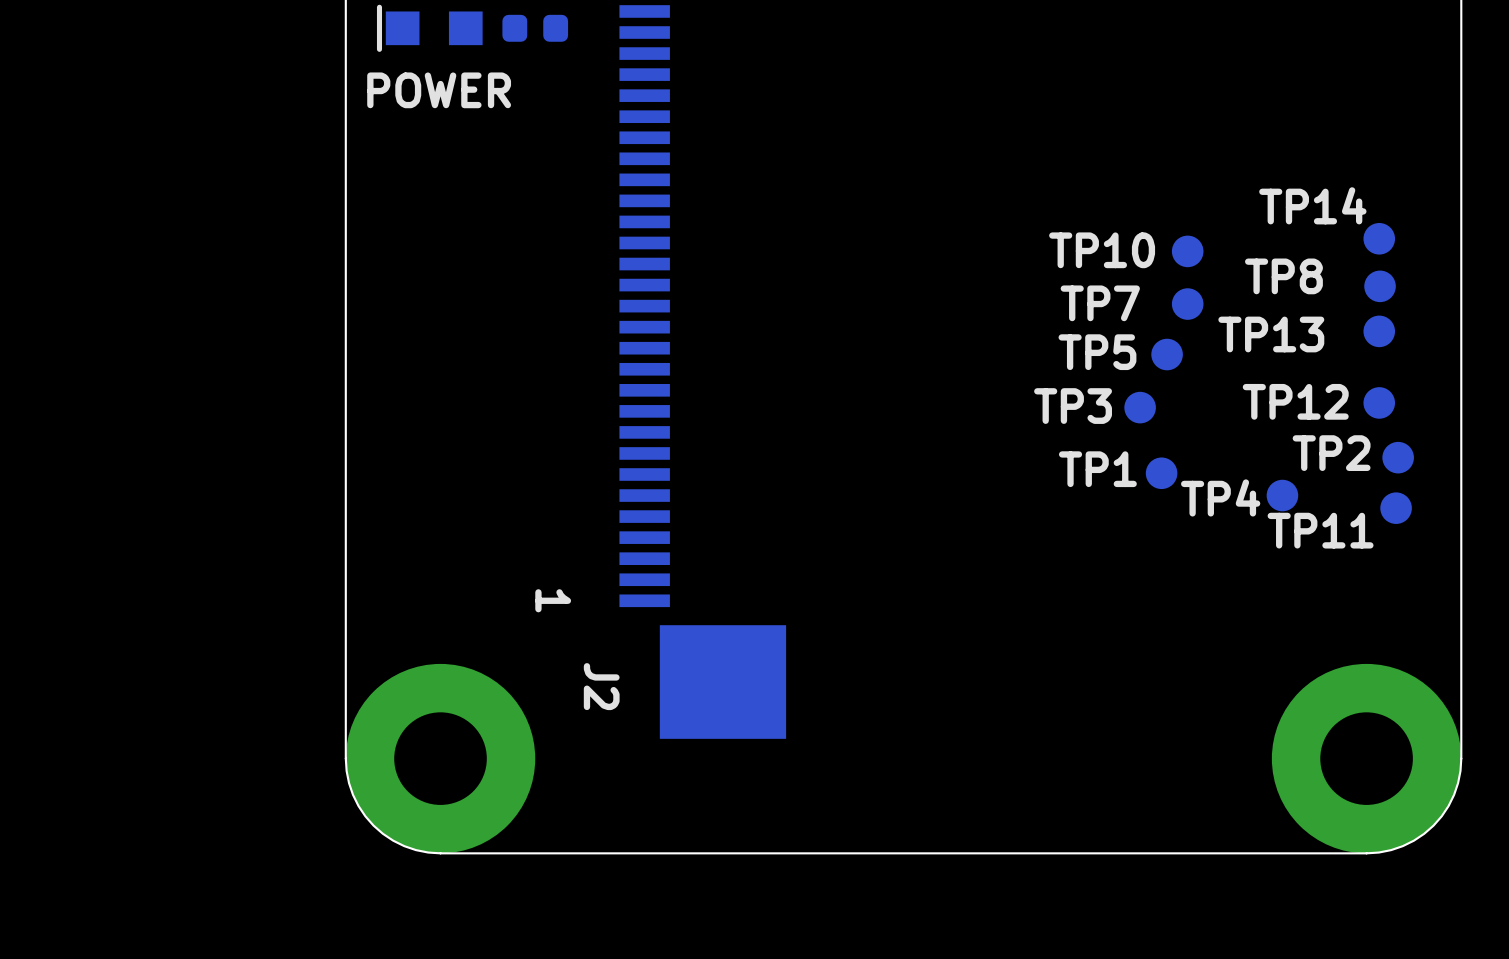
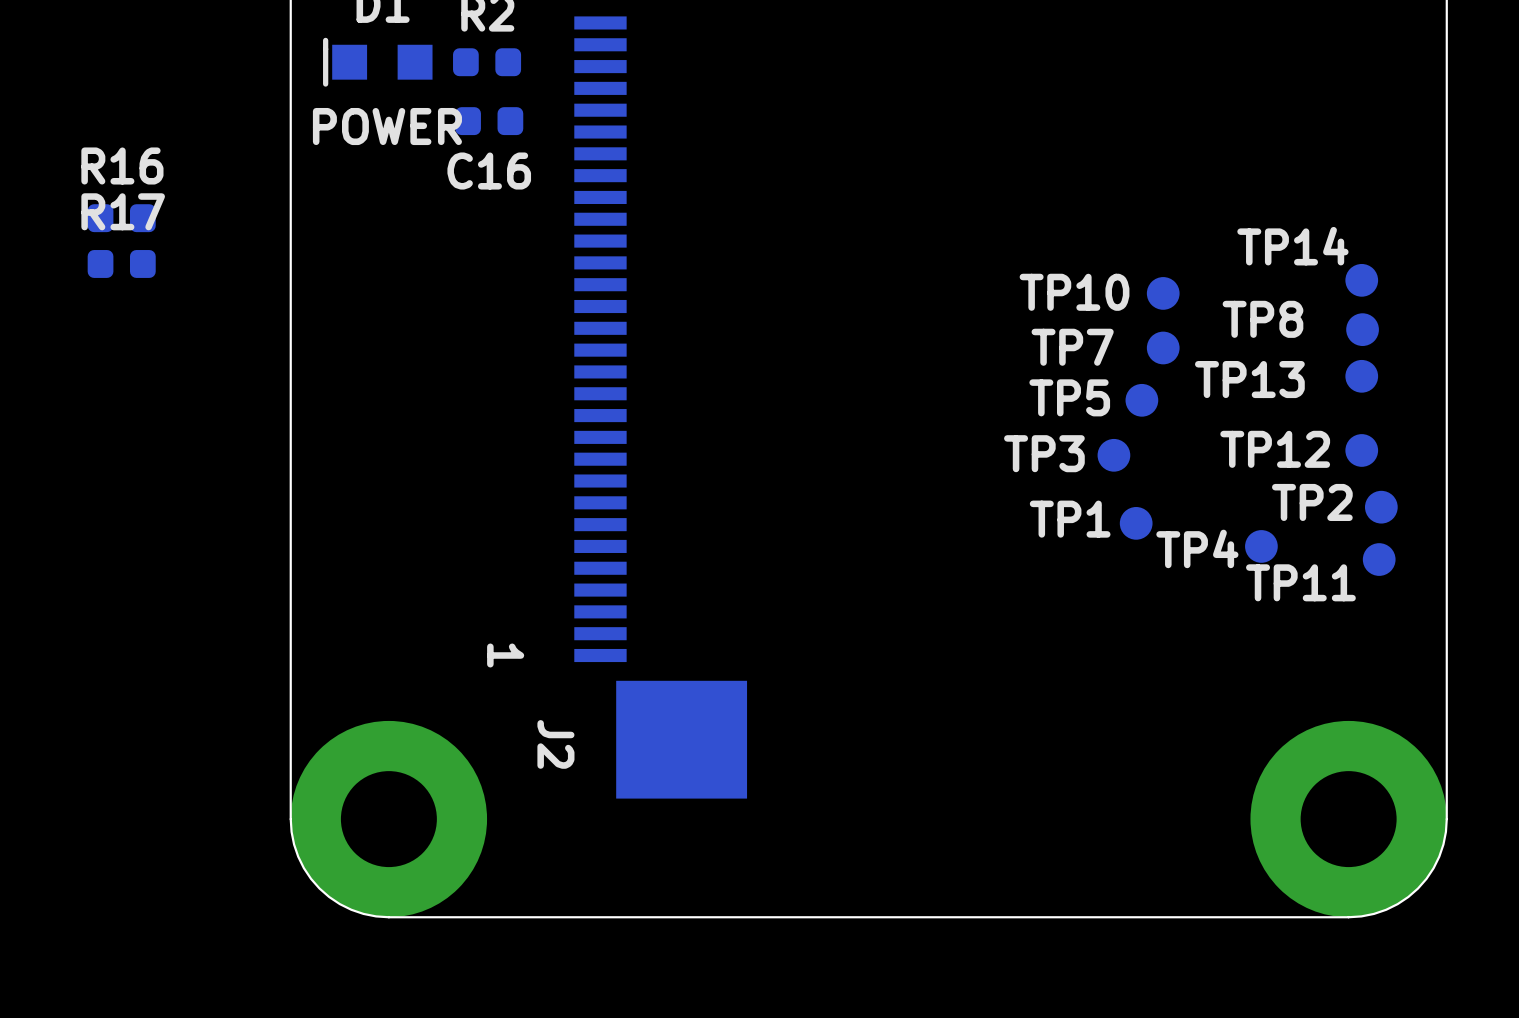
C16: none -> (489, 121)
R16: none -> (121, 218)
R17: none -> (121, 263)

